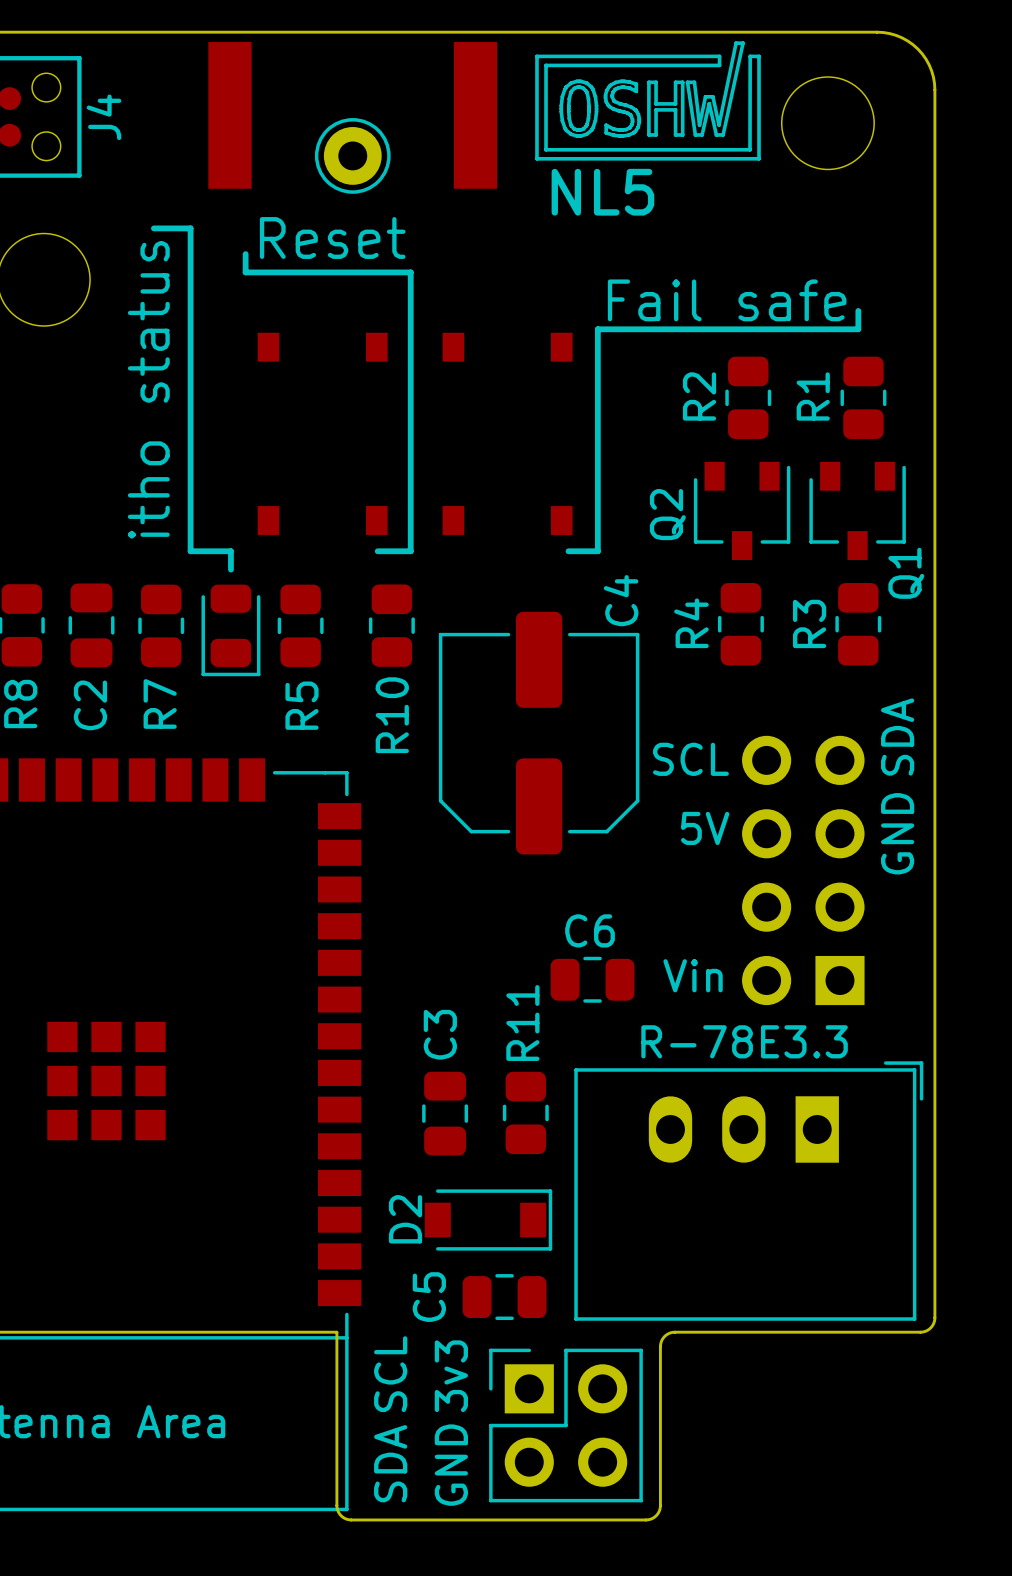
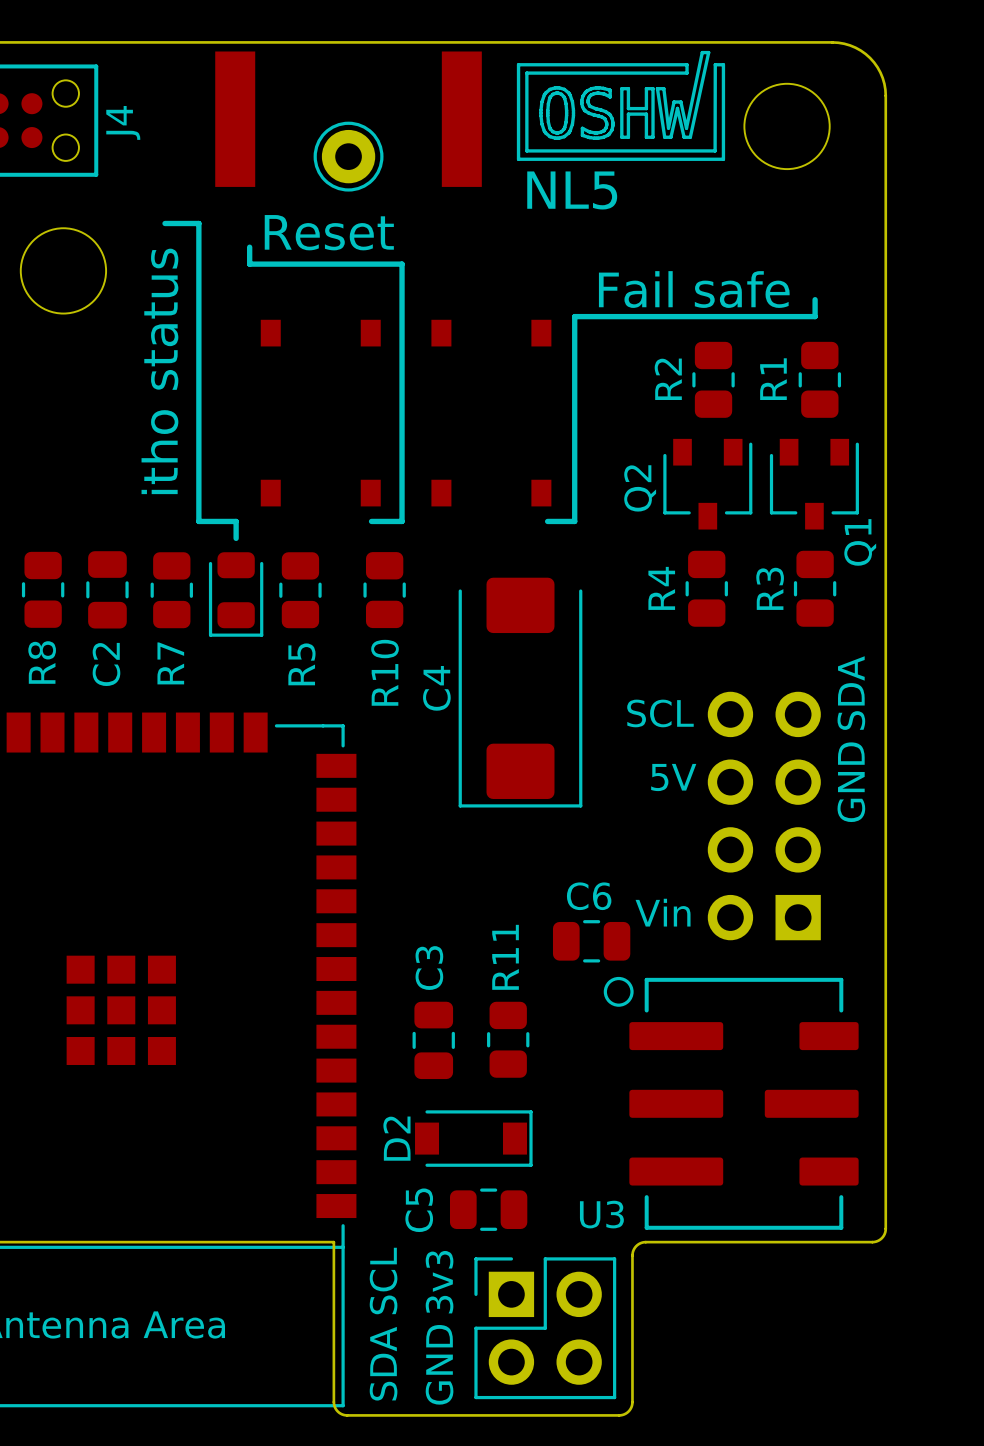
C4 name position: C4 (621, 600) -> C4 (436, 688)
C4 footprint: [438, 611, 640, 855] -> [458, 577, 583, 808]
C6 position: (592, 979) -> (591, 941)
U3: none -> (731, 1103)
R-78E3.3: (748, 1191) -> none

